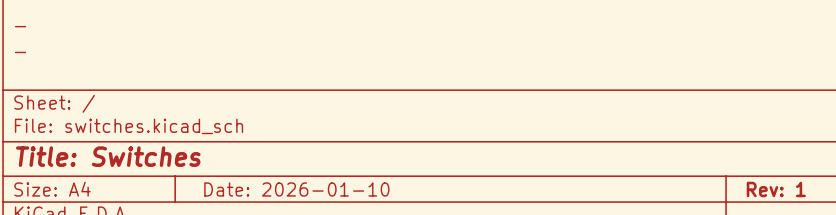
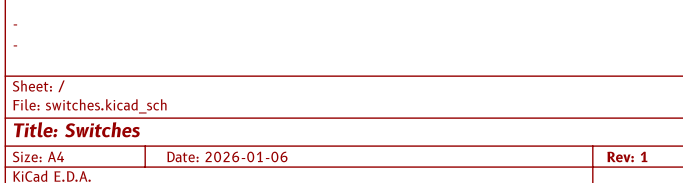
title block: Date: 2026-01-10 (296, 189) -> Date: 2026-01-06 (227, 156)

